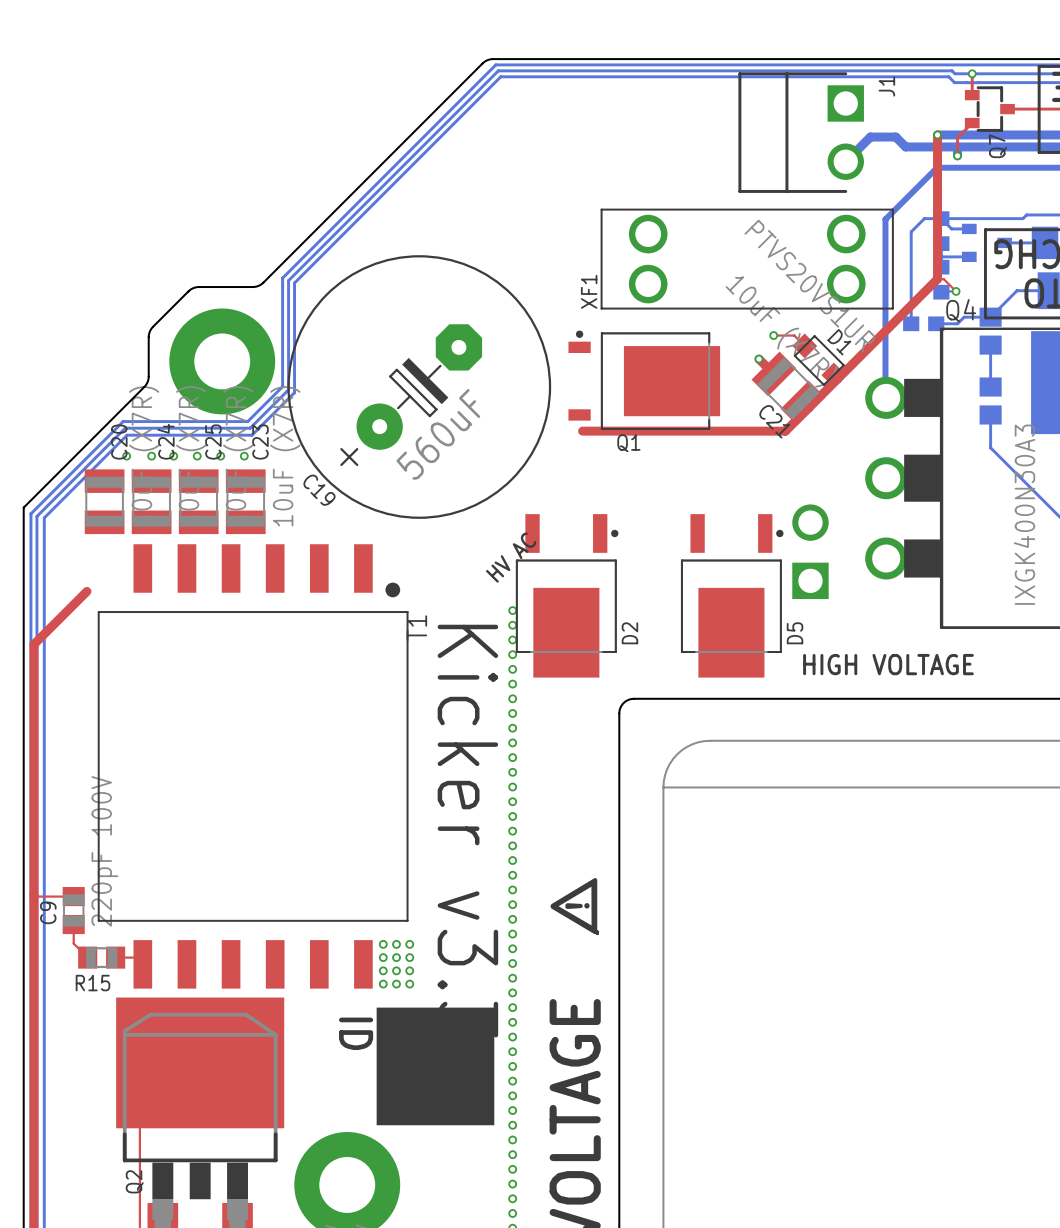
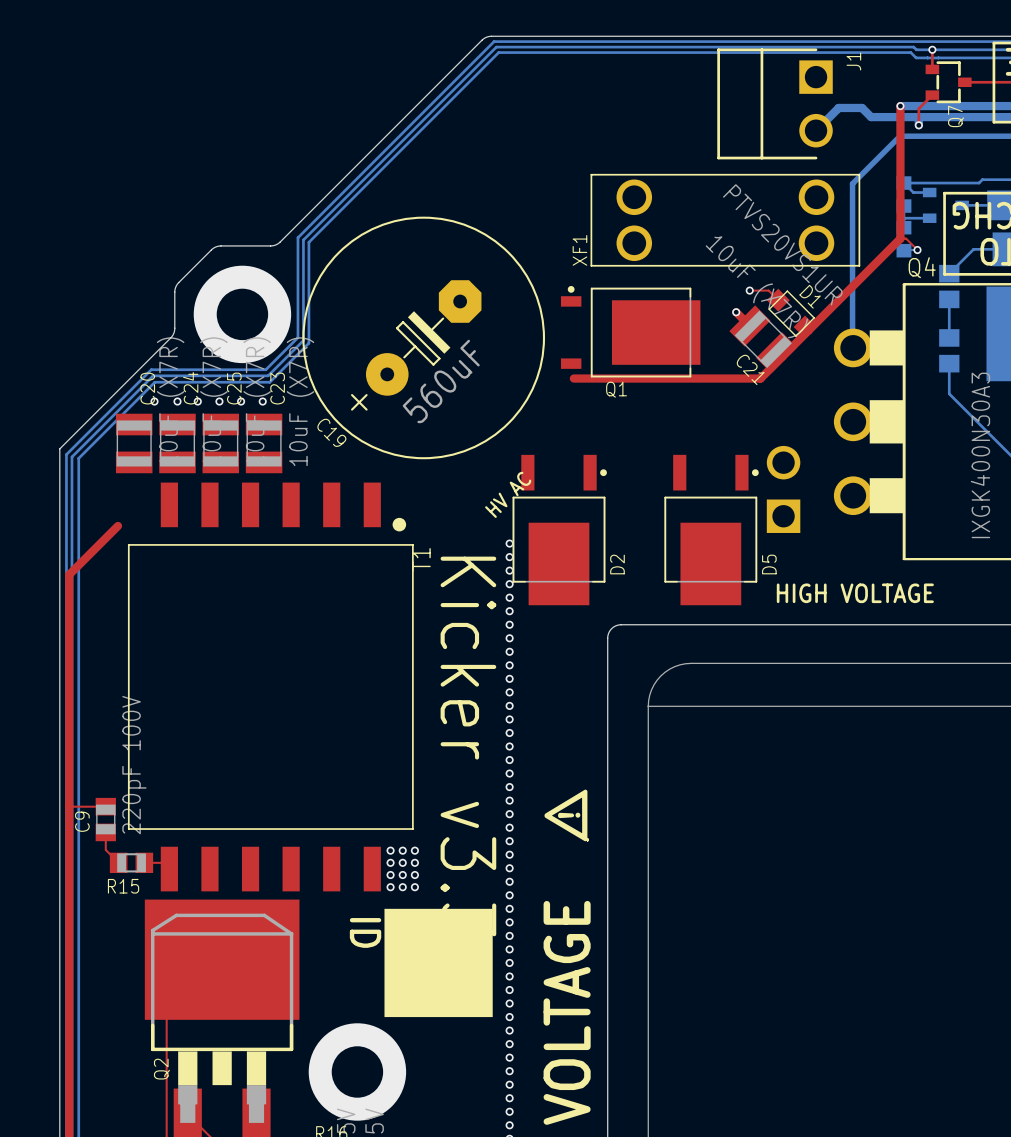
bottom track: (941, 218) (924, 218) (911, 231) (911, 323) -> none
bottom track: (990, 317) (964, 317) (957, 323) (936, 323) -> none
part: (923, 323) -> none

